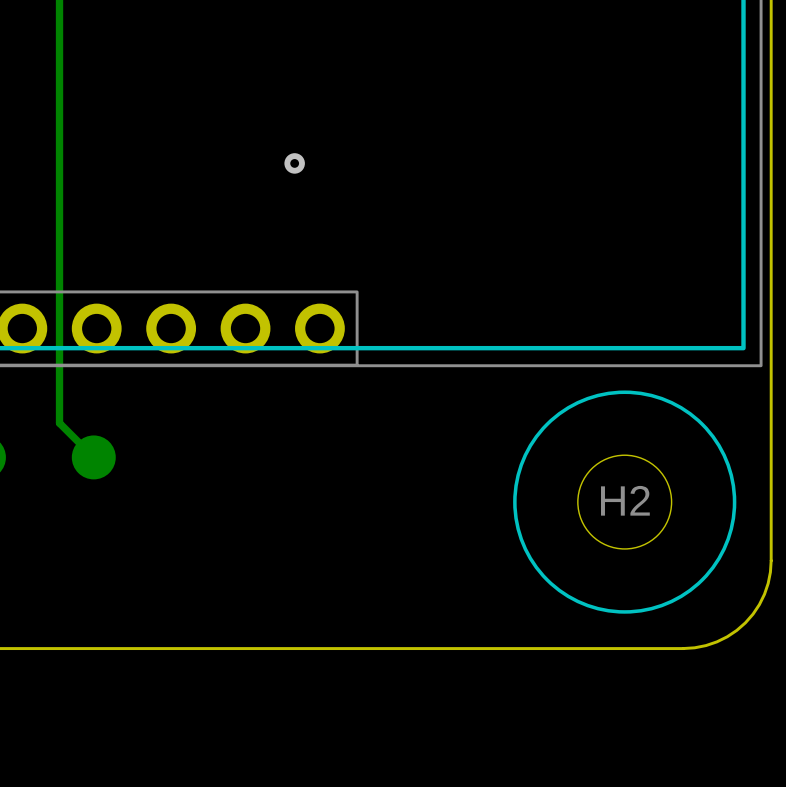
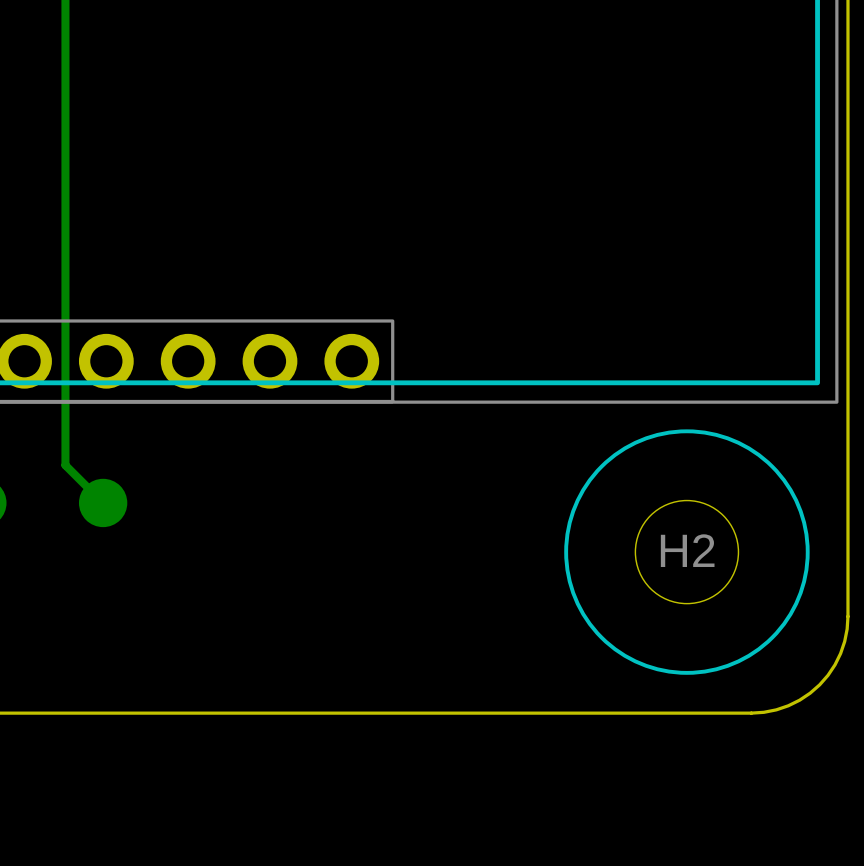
via: (294, 163) -> none

